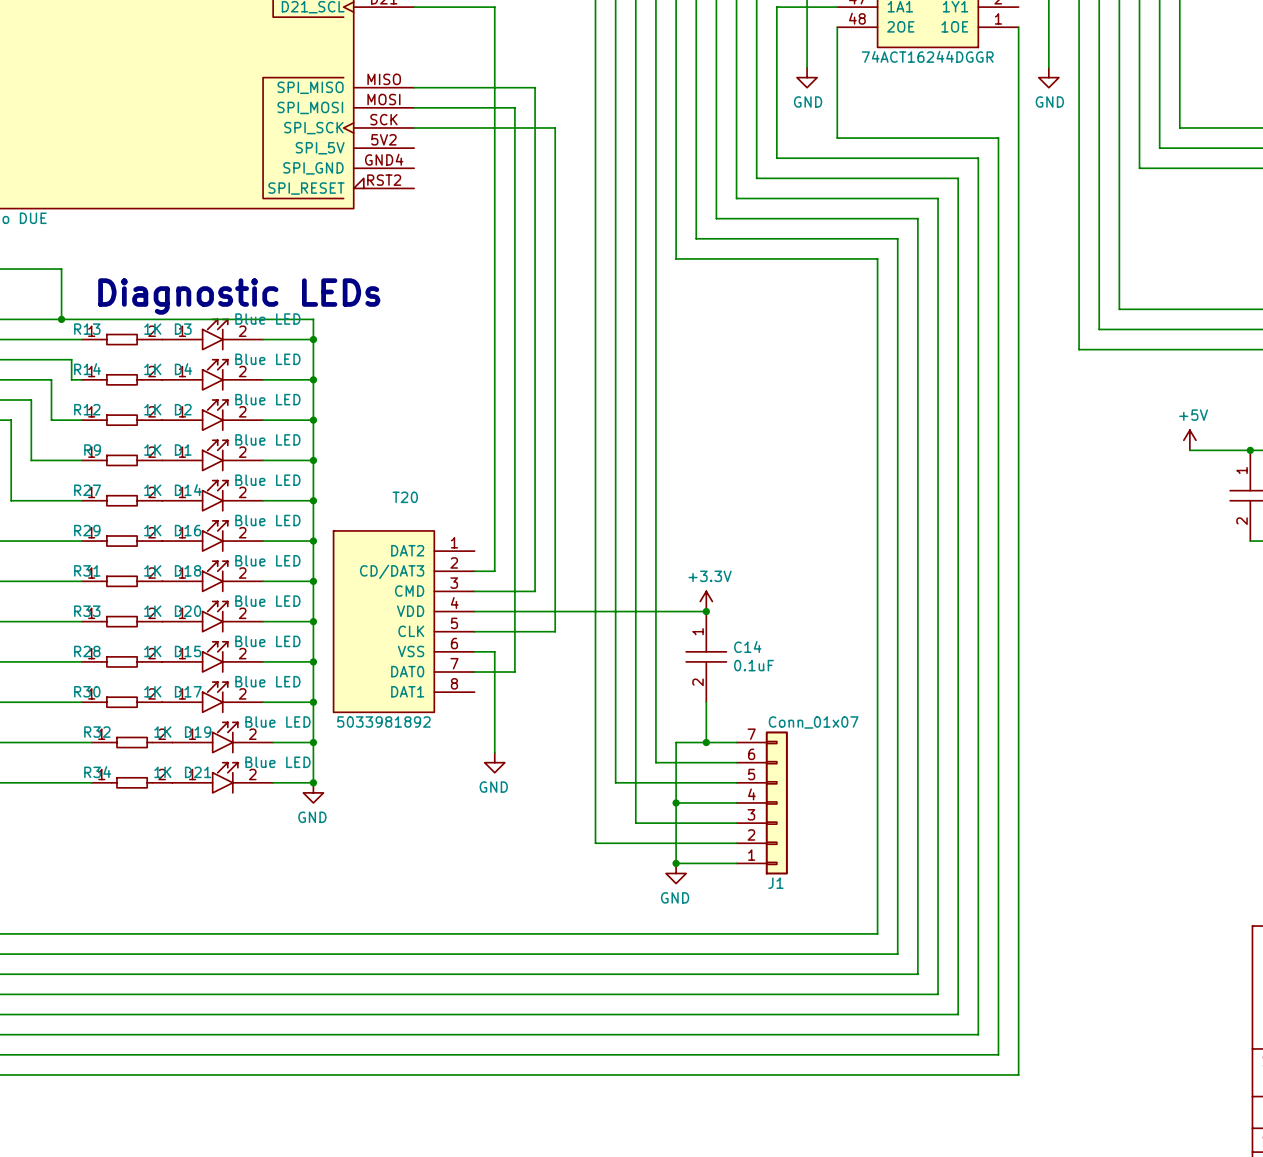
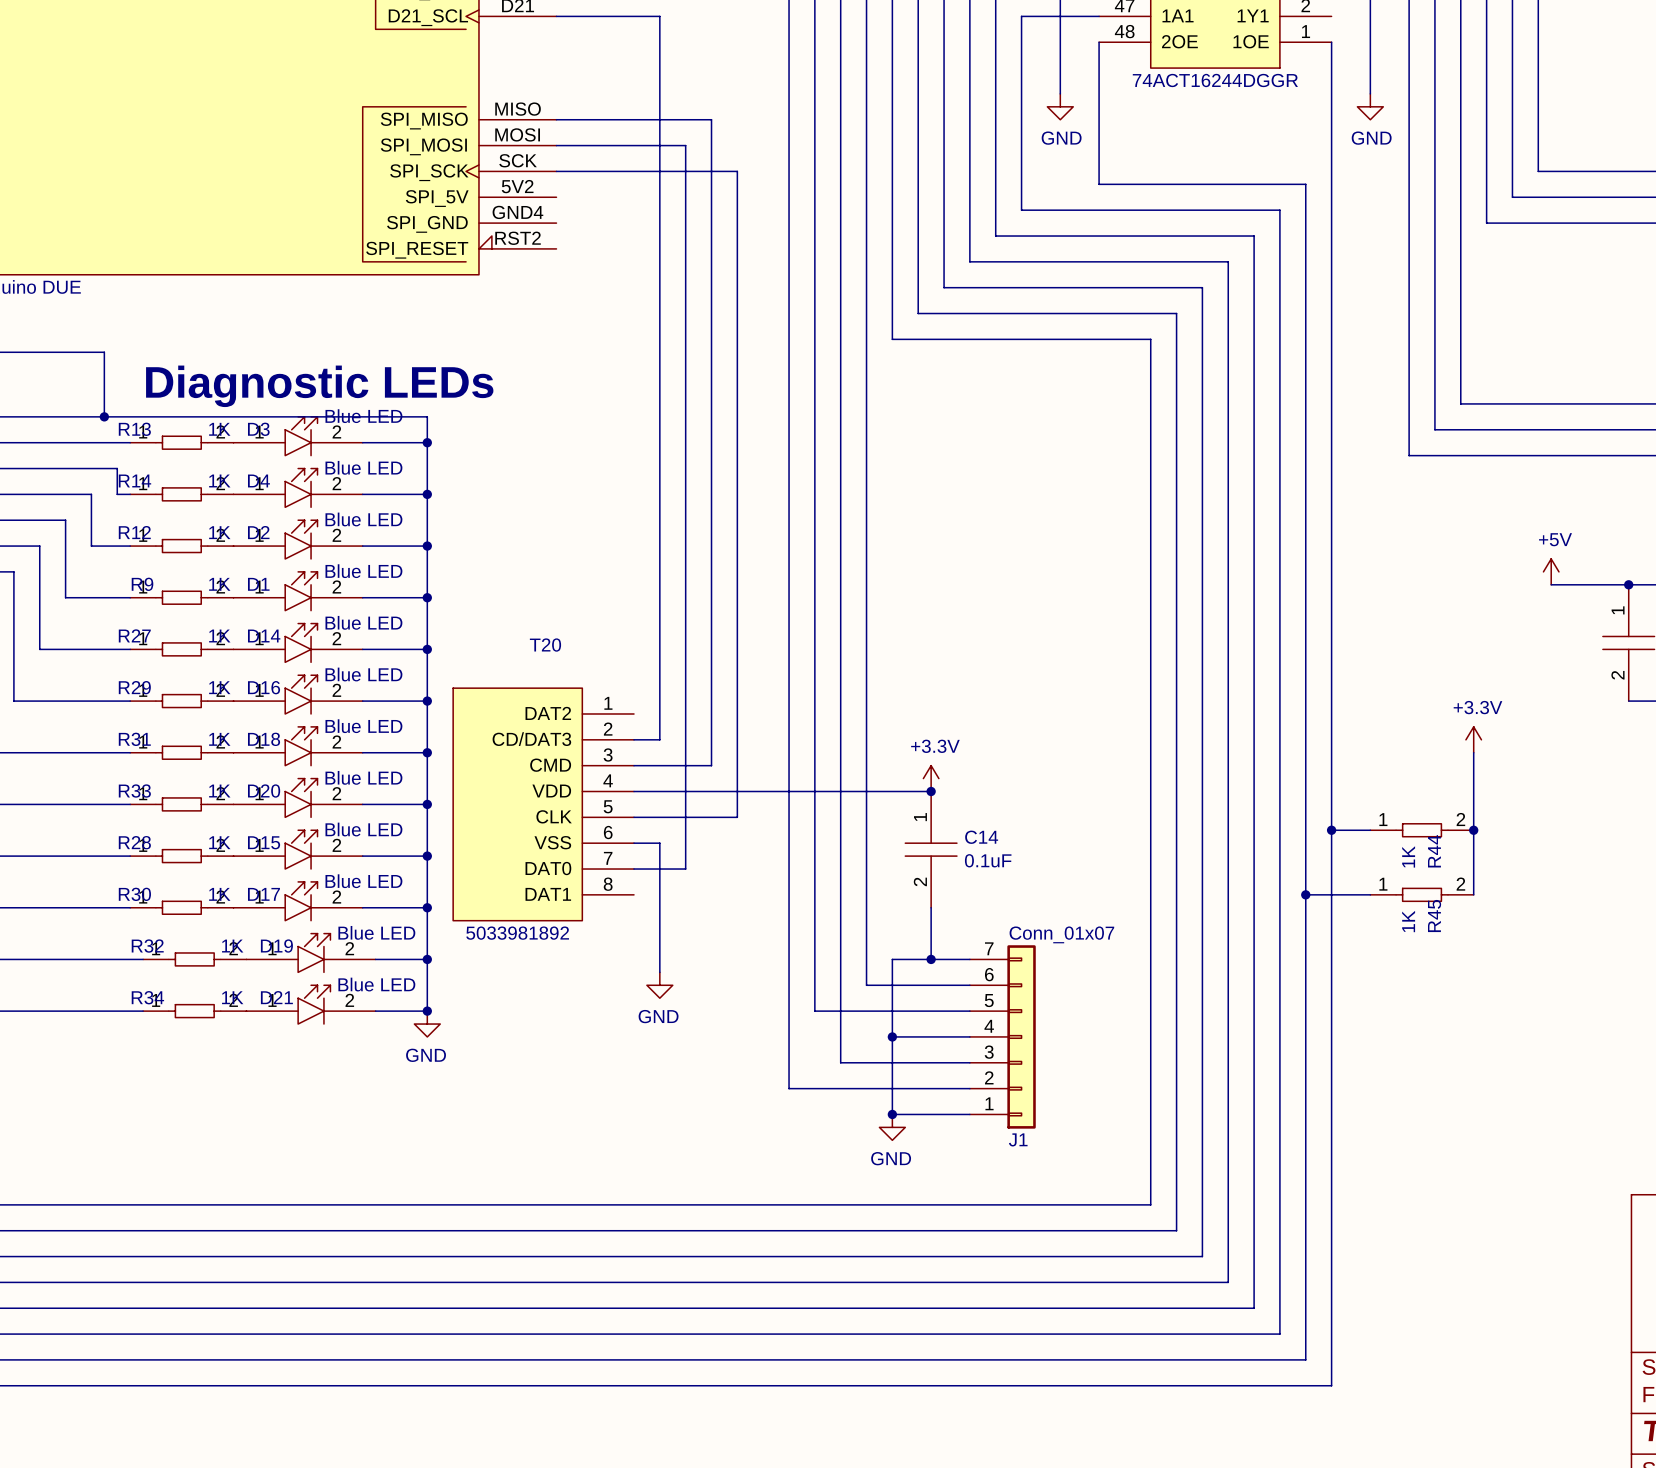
power symbol: none -> +3.3V (1473, 739)
wire: none -> (1473, 752) (1473, 894)
wire: none -> (1331, 830) (1370, 830)
junction: none -> (1331, 830)
R44: none -> (1422, 830)
junction: none -> (1473, 830)
wire: none -> (1305, 894) (1370, 894)
junction: none -> (1305, 894)
R45: none -> (1422, 894)

